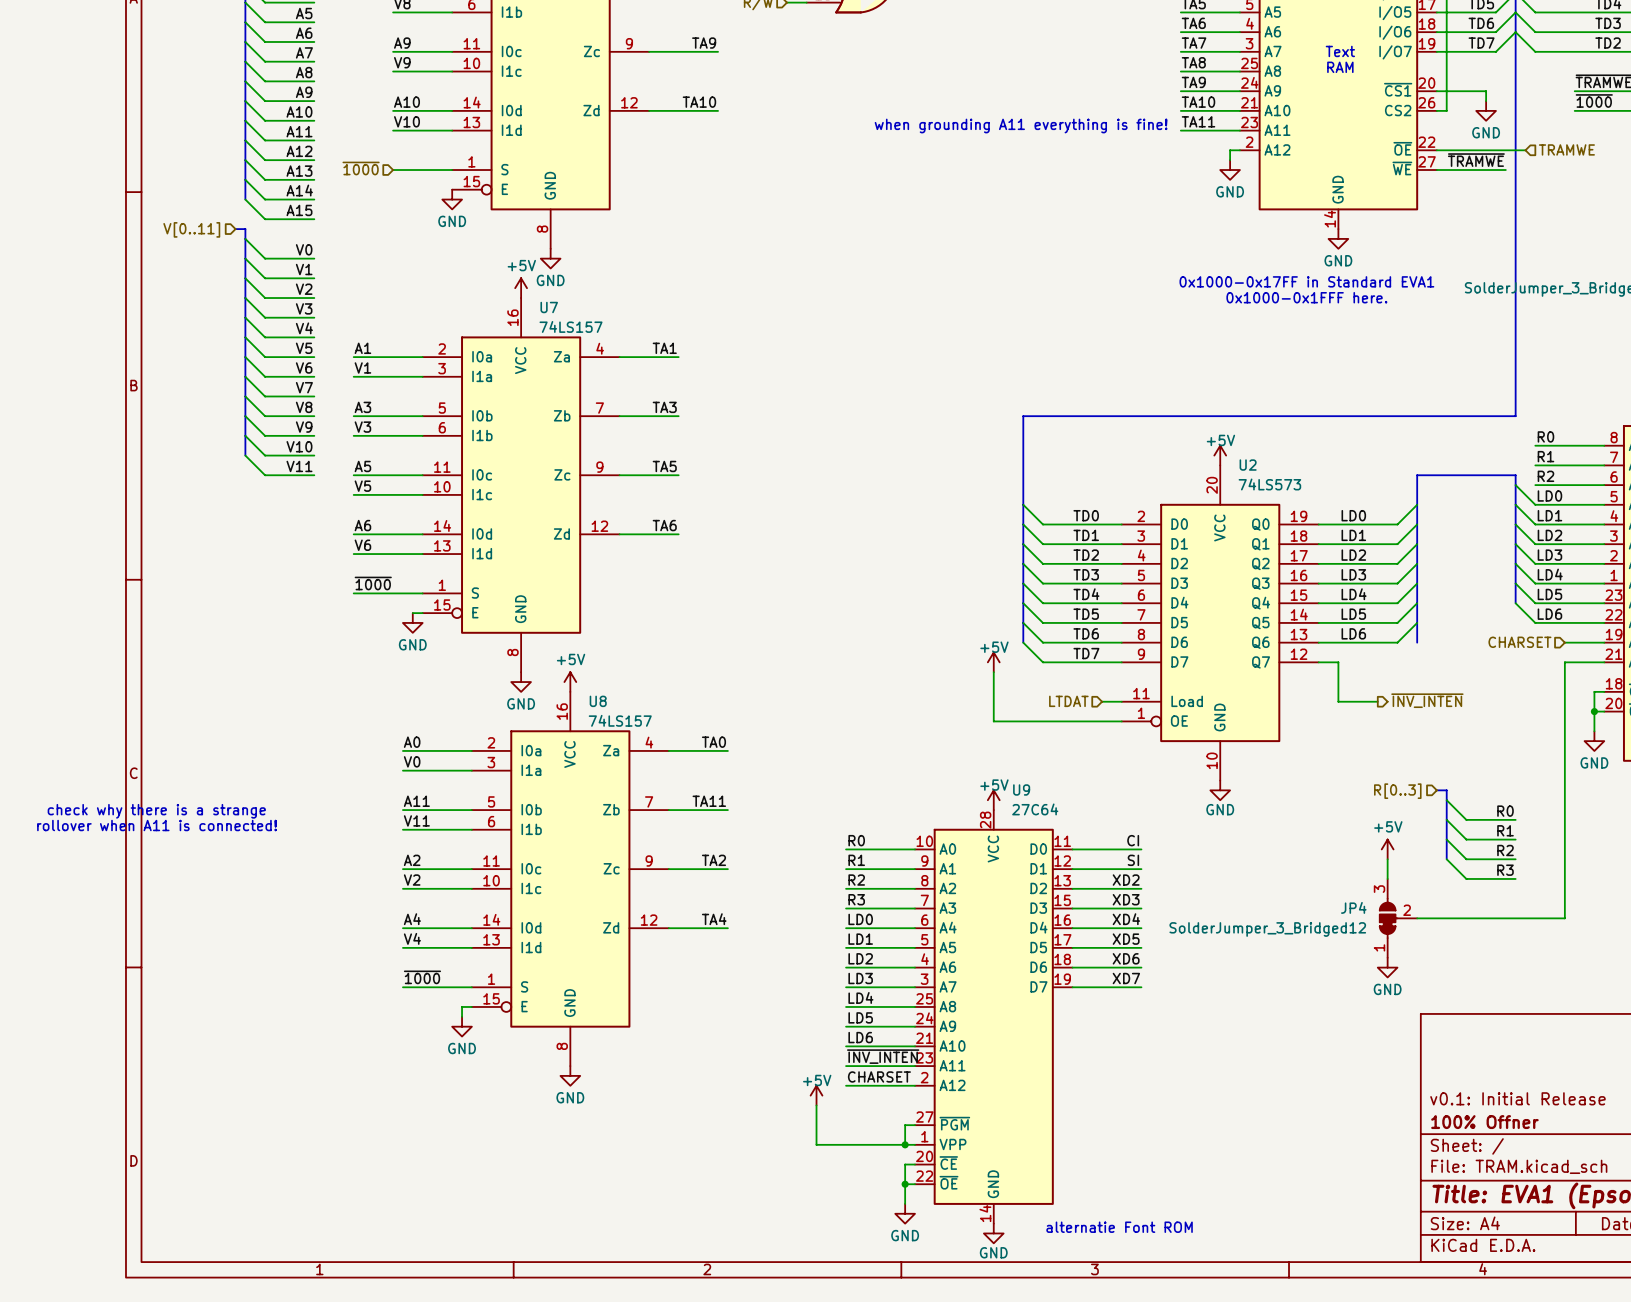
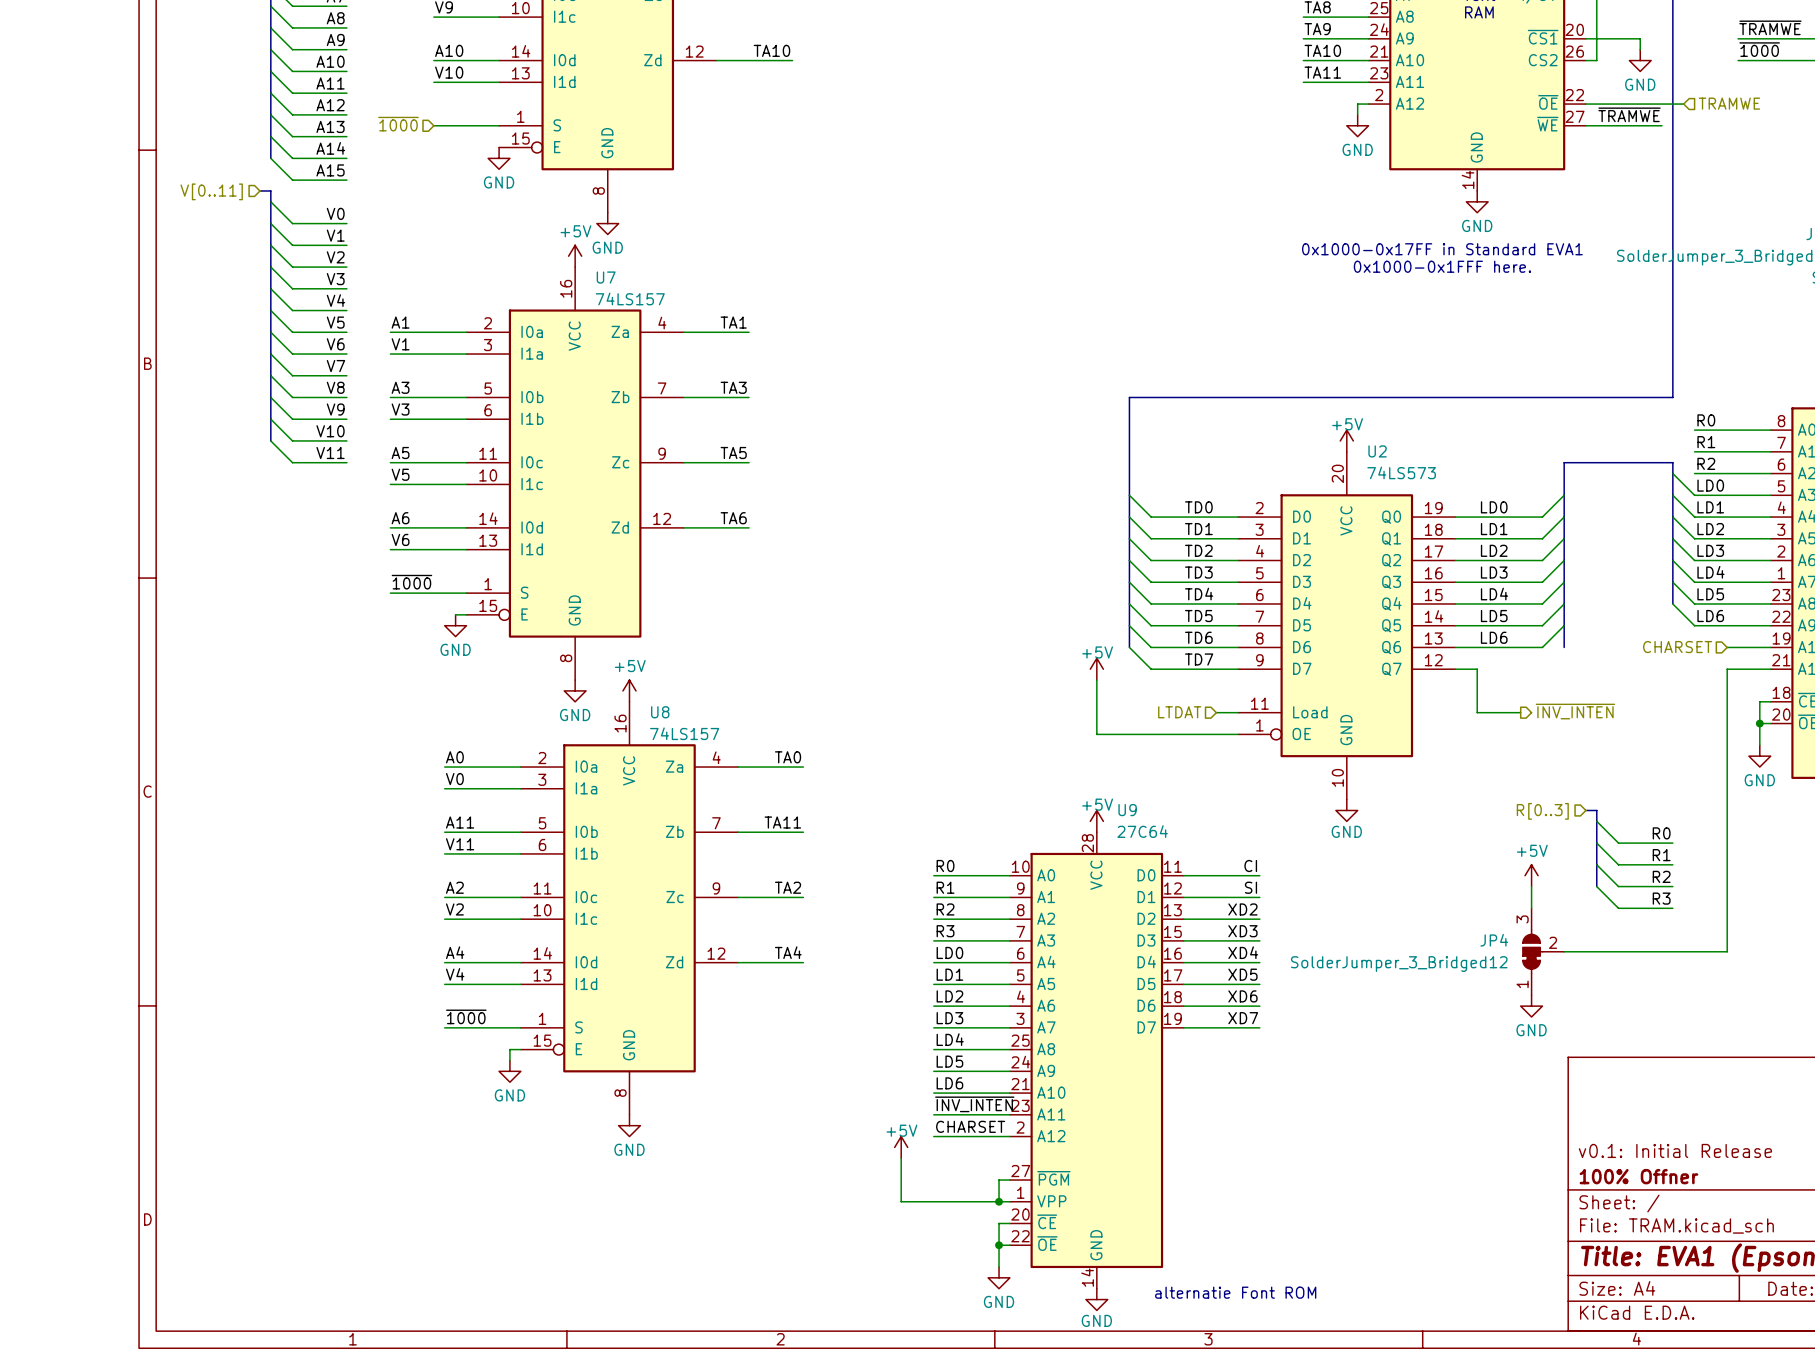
text: when grounding A11 everything is fine! (1021, 126) -> none
text: check why there is a strange (156, 811) -> none
text: rollover when A11 is connected! (157, 825) -> none

